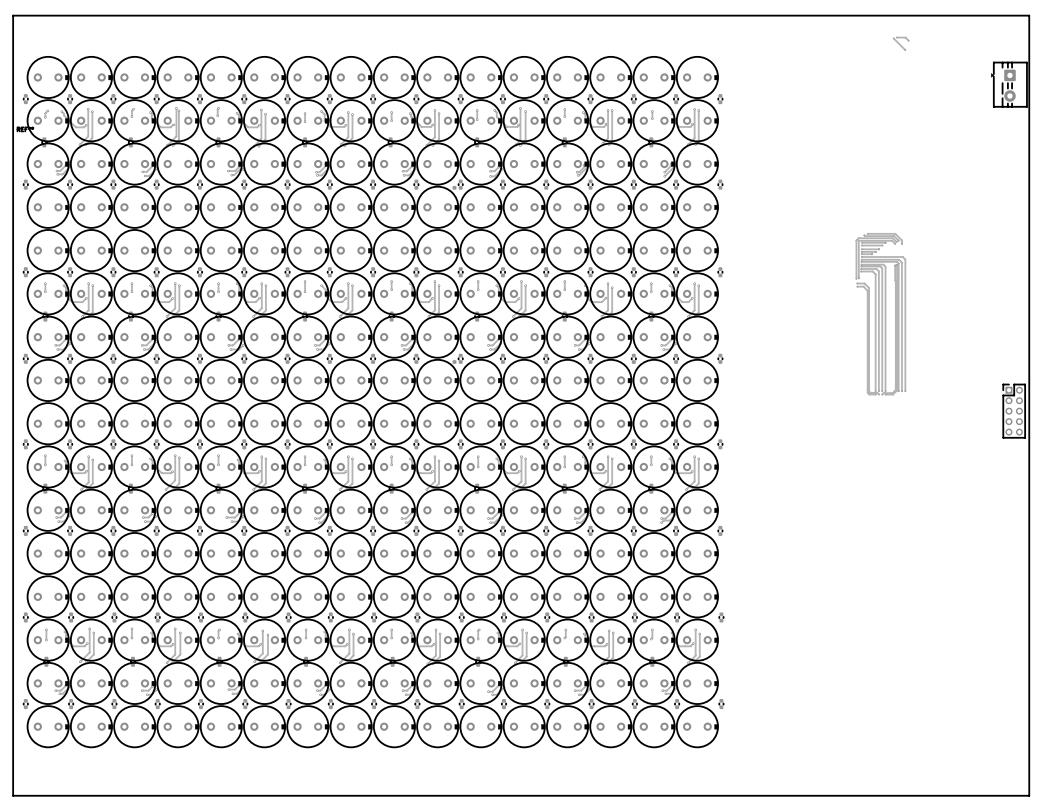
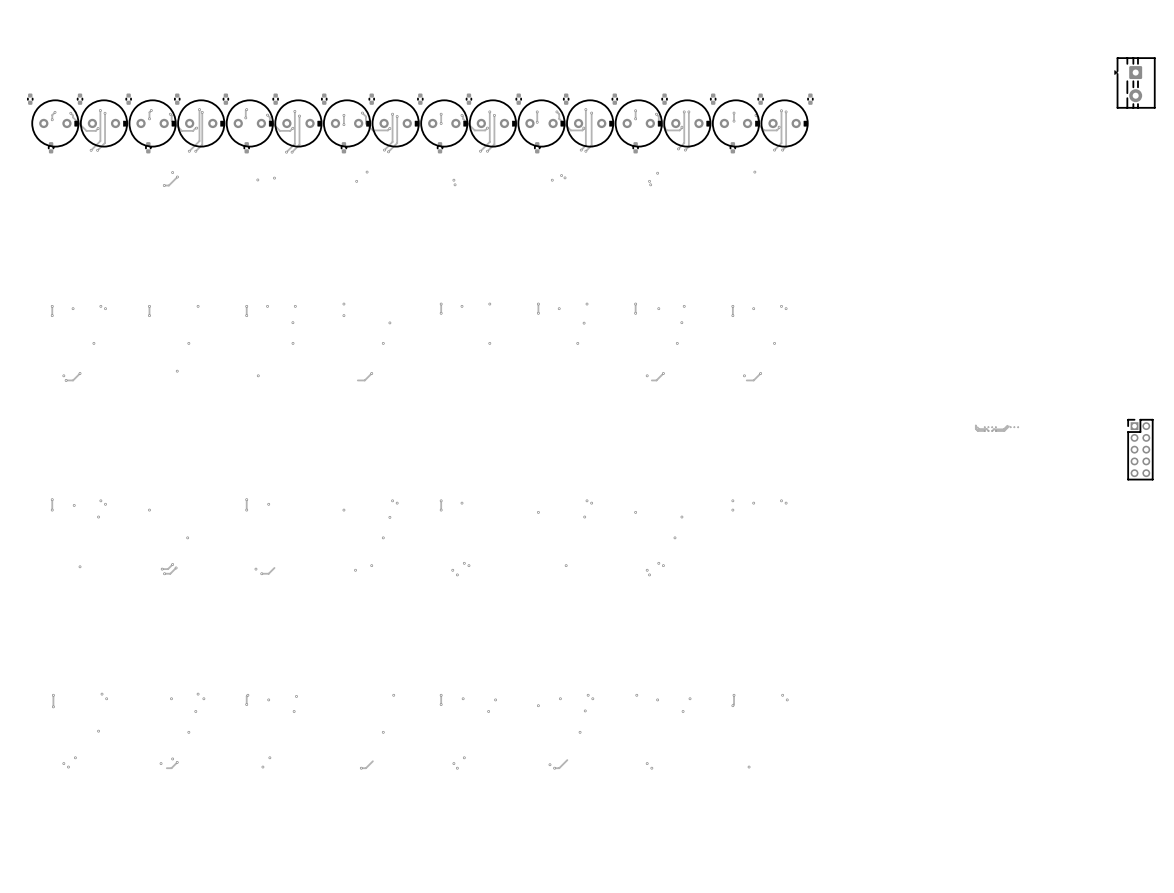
board edge: (13, 15) (1029, 15) (1029, 795) (13, 795) (13, 15) -> none
track: (897, 37) (905, 37) (908, 40) -> none
track: (893, 38) (905, 50) -> none
part: (48, 77) -> none
part: (91, 77) -> none
part: (134, 77) -> none
part: (178, 77) -> none
part: (221, 77) -> none
part: (264, 77) -> none
part: (307, 77) -> none
part: (351, 77) -> none
part: (394, 77) -> none
part: (437, 77) -> none
part: (481, 77) -> none
part: (524, 77) -> none
part: (567, 77) -> none
part: (610, 77) -> none
part: (654, 77) -> none
part: (697, 77) -> none
part: (48, 164) -> none
part: (91, 164) -> none
part: (134, 164) -> none
track: (152, 164) (146, 171) (142, 171) -> none
part: (178, 164) -> none
part: (221, 164) -> none
part: (264, 164) -> none
part: (307, 164) -> none
track: (325, 164) (319, 172) (316, 172) -> none
part: (351, 164) -> none
part: (394, 164) -> none
part: (437, 164) -> none
part: (481, 164) -> none
part: (524, 164) -> none
part: (567, 164) -> none
part: (610, 164) -> none
part: (654, 164) -> none
track: (670, 164) (664, 172) -> none
part: (697, 164) -> none
track: (65, 165) (60, 171) (56, 171) -> none
track: (584, 165) (577, 172) -> none
track: (675, 165) (664, 176) -> none
track: (70, 166) (62, 174) (57, 174) -> none
track: (239, 166) (235, 171) (228, 171) -> none
track: (330, 166) (321, 175) (317, 175) -> none
track: (412, 166) (407, 171) (402, 171) -> none
track: (588, 166) (578, 175) -> none
track: (498, 167) (494, 171) (490, 171) -> none
track: (416, 168) (409, 175) (404, 175) -> none
track: (243, 169) (231, 175) -> none
track: (501, 169) (494, 176) (490, 176) -> none
via: (57, 174) -> none
via: (317, 175) -> none
via: (490, 176) -> none
via: (664, 176) -> none
part: (25, 184) -> none
part: (70, 184) -> none
part: (113, 184) -> none
part: (156, 184) -> none
part: (199, 184) -> none
part: (244, 184) -> none
part: (287, 184) -> none
part: (329, 184) -> none
part: (373, 184) -> none
part: (416, 184) -> none
part: (460, 184) -> none
part: (502, 184) -> none
part: (546, 184) -> none
part: (590, 184) -> none
part: (633, 184) -> none
part: (676, 184) -> none
part: (720, 184) -> none
part: (454, 187) -> none
part: (48, 207) -> none
part: (91, 207) -> none
part: (134, 207) -> none
part: (178, 207) -> none
part: (221, 207) -> none
part: (264, 207) -> none
part: (307, 207) -> none
part: (351, 207) -> none
part: (394, 207) -> none
part: (437, 207) -> none
part: (481, 207) -> none
part: (524, 207) -> none
part: (567, 207) -> none
part: (610, 207) -> none
part: (654, 207) -> none
part: (697, 207) -> none
track: (867, 233) (895, 233) (901, 240) (901, 243) -> none
track: (864, 235) (894, 236) (898, 240) -> none
track: (896, 241) (892, 238) (858, 238) (856, 240) (856, 278) -> none
track: (862, 242) (885, 242) -> none
track: (895, 243) (892, 240) (859, 240) (858, 278) -> none
track: (861, 245) (882, 245) -> none
track: (861, 249) (879, 249) -> none
part: (48, 250) -> none
part: (91, 250) -> none
part: (134, 250) -> none
part: (178, 250) -> none
part: (221, 250) -> none
part: (264, 250) -> none
part: (307, 250) -> none
part: (351, 250) -> none
part: (394, 250) -> none
part: (437, 250) -> none
part: (481, 250) -> none
part: (524, 250) -> none
part: (567, 250) -> none
part: (610, 250) -> none
part: (654, 250) -> none
part: (697, 250) -> none
track: (861, 251) (875, 251) -> none
track: (861, 254) (872, 254) -> none
track: (861, 256) (902, 256) (905, 259) (905, 391) -> none
track: (861, 259) (899, 259) (901, 262) (901, 391) -> none
track: (861, 261) (896, 261) (898, 263) (898, 391) -> none
track: (861, 264) (883, 264) (885, 266) (885, 391) -> none
track: (895, 265) (895, 389) -> none
track: (897, 265) (897, 390) -> none
track: (861, 266) (880, 266) (882, 268) (882, 391) -> none
track: (861, 269) (876, 269) (878, 271) (878, 391) -> none
track: (861, 271) (872, 271) (875, 274) (875, 391) -> none
part: (25, 272) -> none
part: (70, 272) -> none
part: (113, 272) -> none
part: (156, 272) -> none
part: (199, 272) -> none
part: (244, 272) -> none
part: (287, 272) -> none
part: (329, 272) -> none
part: (373, 272) -> none
part: (416, 272) -> none
part: (460, 272) -> none
part: (502, 272) -> none
part: (546, 272) -> none
part: (590, 272) -> none
part: (633, 272) -> none
part: (676, 272) -> none
part: (720, 272) -> none
track: (305, 281) (305, 291) -> none
track: (434, 281) (434, 310) (428, 316) -> none
track: (521, 281) (521, 308) (513, 316) -> none
track: (88, 283) (88, 310) (82, 316) -> none
track: (175, 283) (175, 308) (166, 316) -> none
track: (237, 283) (239, 285) (239, 293) (247, 302) (255, 302) (259, 298) -> none
track: (261, 283) (261, 308) (253, 316) -> none
track: (348, 283) (348, 308) (340, 316) -> none
via: (348, 283) -> none
track: (410, 283) (412, 285) (412, 293) (420, 302) (428, 302) (432, 298) -> none
track: (608, 283) (608, 310) (601, 316) -> none
track: (694, 283) (694, 310) (688, 316) -> none
track: (857, 283) (864, 283) (869, 288) (869, 391) -> none
track: (63, 285) (65, 287) (65, 295) (72, 302) (82, 302) (86, 298) -> none
track: (92, 285) (92, 312) (88, 316) -> none
track: (150, 285) (152, 287) (152, 295) (158, 302) (169, 302) (172, 298) -> none
via: (150, 285) -> none
track: (179, 285) (179, 310) (173, 316) -> none
via: (179, 285) -> none
track: (265, 285) (265, 310) (259, 316) -> none
track: (321, 285) (325, 289) (325, 295) (331, 302) (342, 302) (345, 298) -> none
via: (321, 285) -> none
track: (352, 285) (352, 310) (346, 316) -> none
via: (352, 285) -> none
track: (439, 285) (439, 312) (434, 316) -> none
track: (496, 285) (498, 287) (498, 295) (505, 302) (515, 302) (518, 298) -> none
track: (525, 285) (525, 310) (519, 316) -> none
via: (525, 285) -> none
track: (585, 285) (587, 287) (587, 298) (591, 302) (601, 302) (605, 298) -> none
track: (669, 285) (671, 291) (682, 302) (688, 302) (692, 298) -> none
track: (698, 285) (698, 312) (694, 316) -> none
track: (857, 286) (863, 286) (867, 290) (867, 389) -> none
track: (612, 287) (612, 312) (608, 316) -> none
part: (48, 293) -> none
part: (91, 293) -> none
part: (134, 293) -> none
part: (178, 293) -> none
part: (221, 293) -> none
part: (264, 293) -> none
part: (307, 293) -> none
part: (351, 293) -> none
part: (394, 293) -> none
part: (437, 293) -> none
part: (481, 293) -> none
part: (524, 293) -> none
part: (567, 293) -> none
part: (610, 293) -> none
part: (654, 293) -> none
part: (697, 293) -> none
via: (86, 298) -> none
via: (172, 298) -> none
via: (432, 298) -> none
via: (692, 298) -> none
part: (45, 316) -> none
part: (130, 316) -> none
part: (218, 316) -> none
via: (253, 316) -> none
part: (305, 316) -> none
part: (391, 316) -> none
via: (428, 316) -> none
part: (477, 316) -> none
part: (564, 316) -> none
part: (651, 316) -> none
part: (48, 337) -> none
part: (91, 337) -> none
part: (134, 337) -> none
part: (178, 337) -> none
part: (221, 337) -> none
part: (264, 337) -> none
part: (307, 337) -> none
part: (351, 337) -> none
part: (394, 337) -> none
part: (437, 337) -> none
part: (481, 337) -> none
part: (524, 337) -> none
part: (567, 337) -> none
part: (610, 337) -> none
part: (654, 337) -> none
part: (697, 337) -> none
track: (65, 339) (59, 345) (55, 345) -> none
track: (152, 339) (146, 345) (142, 345) -> none
track: (239, 339) (232, 345) (228, 345) -> none
track: (325, 339) (319, 345) (315, 345) -> none
track: (412, 339) (406, 345) (401, 345) -> none
track: (498, 339) (492, 345) (488, 345) -> none
track: (585, 339) (579, 345) (575, 345) -> none
track: (671, 339) (665, 345) (661, 345) -> none
track: (156, 341) (148, 349) (144, 349) -> none
track: (416, 341) (408, 349) (404, 349) -> none
track: (500, 343) (494, 349) (490, 349) -> none
via: (142, 345) -> none
track: (243, 345) (239, 349) (230, 349) -> none
via: (243, 345) -> none
via: (315, 345) -> none
via: (401, 345) -> none
via: (488, 345) -> none
via: (144, 349) -> none
via: (230, 349) -> none
via: (317, 349) -> none
via: (404, 349) -> none
via: (490, 349) -> none
via: (579, 349) -> none
via: (663, 349) -> none
part: (25, 358) -> none
part: (70, 358) -> none
part: (113, 358) -> none
part: (156, 358) -> none
part: (199, 358) -> none
part: (244, 358) -> none
part: (287, 358) -> none
part: (329, 358) -> none
part: (373, 358) -> none
part: (416, 358) -> none
part: (460, 358) -> none
part: (502, 358) -> none
part: (546, 358) -> none
part: (590, 358) -> none
part: (633, 358) -> none
part: (676, 358) -> none
part: (720, 358) -> none
part: (454, 362) -> none
part: (48, 380) -> none
part: (91, 380) -> none
part: (134, 380) -> none
part: (178, 380) -> none
part: (221, 380) -> none
part: (264, 380) -> none
part: (307, 380) -> none
part: (351, 380) -> none
part: (394, 380) -> none
part: (437, 380) -> none
part: (481, 380) -> none
part: (524, 380) -> none
part: (567, 380) -> none
part: (610, 380) -> none
part: (654, 380) -> none
part: (697, 380) -> none
part: (48, 423) -> none
part: (91, 423) -> none
part: (134, 423) -> none
part: (178, 423) -> none
part: (221, 423) -> none
part: (264, 423) -> none
part: (307, 423) -> none
part: (351, 423) -> none
part: (394, 423) -> none
part: (437, 423) -> none
part: (481, 423) -> none
part: (524, 423) -> none
part: (567, 423) -> none
part: (610, 423) -> none
part: (654, 423) -> none
part: (697, 423) -> none
part: (25, 444) -> none
part: (70, 444) -> none
part: (113, 444) -> none
part: (156, 444) -> none
part: (199, 444) -> none
part: (244, 444) -> none
part: (287, 444) -> none
part: (329, 444) -> none
part: (373, 444) -> none
part: (416, 444) -> none
part: (460, 444) -> none
part: (502, 444) -> none
part: (546, 444) -> none
part: (590, 444) -> none
part: (633, 444) -> none
part: (676, 444) -> none
part: (720, 444) -> none
track: (131, 455) (131, 464) -> none
track: (175, 455) (175, 480) (165, 489) -> none
track: (88, 456) (88, 482) (81, 489) -> none
track: (261, 456) (261, 481) (253, 489) -> none
track: (305, 456) (305, 464) -> none
track: (348, 456) (348, 481) (340, 489) -> none
track: (434, 456) (434, 481) (426, 489) -> none
track: (478, 456) (478, 467) -> none
track: (521, 456) (521, 481) (513, 489) -> none
track: (564, 456) (564, 467) -> none
track: (583, 456) (585, 458) (585, 467) (591, 473) (603, 473) (606, 471) -> none
via: (583, 456) -> none
track: (608, 456) (608, 481) (599, 489) -> none
track: (651, 456) (651, 464) -> none
track: (694, 456) (694, 481) (686, 489) -> none
track: (179, 457) (179, 483) (173, 489) -> none
via: (179, 457) -> none
track: (150, 458) (152, 463) (161, 473) (172, 471) -> none
via: (150, 458) -> none
track: (265, 458) (265, 483) (259, 489) -> none
track: (352, 458) (352, 483) (346, 489) -> none
track: (410, 458) (412, 467) (418, 473) (430, 473) (432, 471) -> none
track: (496, 458) (498, 464) (507, 473) (517, 473) (519, 471) -> none
track: (525, 458) (525, 483) (519, 489) -> none
track: (612, 458) (612, 483) (606, 489) -> none
track: (669, 458) (671, 460) (671, 469) (676, 473) (690, 473) (692, 471) -> none
track: (698, 458) (698, 483) (692, 489) -> none
track: (92, 459) (92, 483) (86, 489) -> none
track: (238, 459) (239, 468) (244, 473) (257, 473) (259, 471) -> none
track: (324, 459) (325, 465) (332, 473) (344, 473) (345, 471) -> none
track: (64, 460) (65, 468) (71, 473) (84, 473) (86, 471) -> none
track: (439, 460) (439, 483) (432, 489) -> none
part: (48, 467) -> none
part: (91, 467) -> none
part: (134, 467) -> none
part: (178, 467) -> none
part: (221, 467) -> none
part: (264, 467) -> none
part: (307, 467) -> none
part: (351, 467) -> none
part: (394, 467) -> none
part: (437, 467) -> none
part: (481, 467) -> none
part: (524, 467) -> none
part: (567, 467) -> none
part: (610, 467) -> none
part: (654, 467) -> none
part: (697, 467) -> none
via: (172, 471) -> none
via: (259, 471) -> none
via: (432, 471) -> none
via: (692, 471) -> none
part: (45, 488) -> none
part: (130, 488) -> none
part: (218, 488) -> none
part: (305, 488) -> none
part: (391, 488) -> none
part: (477, 488) -> none
part: (564, 488) -> none
part: (651, 488) -> none
via: (81, 489) -> none
via: (253, 489) -> none
via: (426, 489) -> none
via: (513, 489) -> none
via: (686, 489) -> none
part: (48, 510) -> none
part: (91, 510) -> none
part: (134, 510) -> none
part: (178, 510) -> none
part: (221, 510) -> none
part: (264, 510) -> none
part: (307, 510) -> none
part: (351, 510) -> none
part: (394, 510) -> none
part: (437, 510) -> none
part: (481, 510) -> none
part: (524, 510) -> none
part: (567, 510) -> none
part: (610, 510) -> none
part: (654, 510) -> none
part: (697, 510) -> none
track: (65, 512) (60, 517) (56, 517) -> none
track: (240, 512) (235, 517) (226, 517) -> none
track: (325, 512) (319, 518) (315, 518) -> none
track: (412, 512) (406, 518) (401, 518) -> none
track: (498, 512) (492, 518) (488, 518) -> none
track: (585, 512) (579, 518) (575, 518) -> none
track: (671, 512) (665, 518) (661, 518) -> none
track: (676, 513) (669, 520) (661, 522) -> none
track: (329, 514) (319, 522) -> none
track: (416, 514) (406, 522) -> none
track: (502, 514) (494, 522) (490, 522) -> none
track: (589, 514) (581, 522) (577, 522) -> none
track: (70, 515) (63, 521) (58, 521) -> none
via: (243, 516) -> none
via: (56, 517) -> none
via: (488, 518) -> none
via: (661, 518) -> none
via: (58, 521) -> none
via: (319, 522) -> none
via: (490, 522) -> none
via: (661, 522) -> none
part: (25, 530) -> none
part: (70, 530) -> none
part: (113, 530) -> none
part: (156, 530) -> none
part: (199, 530) -> none
part: (244, 530) -> none
part: (287, 530) -> none
part: (329, 530) -> none
part: (373, 530) -> none
part: (416, 530) -> none
part: (460, 530) -> none
part: (502, 530) -> none
part: (546, 530) -> none
part: (590, 530) -> none
part: (633, 530) -> none
part: (676, 530) -> none
part: (720, 530) -> none
part: (48, 553) -> none
part: (91, 553) -> none
part: (134, 553) -> none
part: (178, 553) -> none
part: (221, 553) -> none
part: (264, 553) -> none
part: (307, 553) -> none
part: (351, 553) -> none
part: (394, 553) -> none
part: (437, 553) -> none
part: (481, 553) -> none
part: (524, 553) -> none
part: (567, 553) -> none
part: (610, 553) -> none
part: (654, 553) -> none
part: (697, 553) -> none
part: (48, 596) -> none
part: (91, 596) -> none
part: (134, 596) -> none
part: (178, 596) -> none
part: (221, 596) -> none
part: (264, 596) -> none
part: (307, 596) -> none
part: (351, 596) -> none
part: (394, 596) -> none
part: (437, 596) -> none
part: (481, 596) -> none
part: (524, 596) -> none
part: (567, 596) -> none
part: (610, 596) -> none
part: (654, 596) -> none
part: (697, 596) -> none
part: (25, 617) -> none
part: (71, 617) -> none
part: (114, 617) -> none
part: (157, 617) -> none
part: (200, 617) -> none
part: (245, 617) -> none
part: (288, 617) -> none
part: (330, 617) -> none
part: (374, 617) -> none
part: (417, 617) -> none
part: (461, 617) -> none
part: (503, 617) -> none
part: (547, 617) -> none
part: (591, 617) -> none
part: (634, 617) -> none
part: (677, 617) -> none
part: (721, 617) -> none
track: (89, 628) (89, 652) (80, 661) -> none
track: (131, 628) (131, 638) -> none
track: (175, 628) (175, 654) (166, 662) -> none
track: (306, 629) (306, 638) -> none
track: (349, 629) (349, 653) (340, 662) -> none
track: (435, 629) (435, 655) (427, 663) -> none
track: (479, 629) (478, 639) -> none
track: (522, 629) (522, 655) (515, 662) -> none
track: (565, 629) (564, 638) -> none
track: (695, 629) (695, 655) (688, 662) -> none
track: (262, 630) (262, 653) (254, 661) -> none
track: (609, 630) (609, 656) (601, 663) -> none
track: (64, 631) (65, 639) (73, 646) (84, 646) (87, 643) -> none
track: (324, 631) (325, 639) (332, 646) (345, 646) (347, 644) -> none
track: (93, 632) (93, 654) (86, 661) -> none
track: (151, 632) (152, 639) (159, 646) (171, 646) (173, 644) -> none
track: (180, 632) (180, 654) (172, 662) -> none
track: (411, 632) (412, 640) (418, 646) (431, 646) (433, 644) -> none
track: (497, 632) (498, 639) (506, 646) (517, 646) (519, 643) -> none
track: (526, 632) (526, 656) (520, 662) -> none
track: (613, 632) (613, 657) (607, 663) -> none
track: (671, 632) (672, 640) (679, 646) (690, 646) (693, 643) -> none
track: (238, 633) (239, 640) (245, 646) (258, 646) (260, 644) -> none
track: (353, 633) (353, 655) (346, 662) -> none
via: (353, 633) -> none
track: (440, 633) (440, 656) (432, 663) -> none
track: (584, 633) (585, 640) (591, 646) (604, 646) (607, 644) -> none
track: (699, 633) (699, 656) (693, 662) -> none
track: (267, 635) (267, 654) (259, 662) -> none
part: (48, 640) -> none
part: (91, 640) -> none
part: (134, 640) -> none
part: (178, 640) -> none
part: (221, 640) -> none
part: (264, 640) -> none
part: (307, 640) -> none
part: (351, 640) -> none
part: (394, 640) -> none
part: (437, 640) -> none
part: (481, 640) -> none
part: (524, 640) -> none
part: (567, 640) -> none
part: (610, 640) -> none
part: (654, 640) -> none
part: (697, 640) -> none
via: (87, 643) -> none
via: (693, 643) -> none
via: (347, 644) -> none
part: (46, 661) -> none
via: (80, 661) -> none
part: (132, 661) -> none
part: (219, 661) -> none
via: (254, 661) -> none
part: (306, 661) -> none
part: (392, 661) -> none
part: (478, 661) -> none
part: (565, 661) -> none
part: (652, 661) -> none
via: (688, 662) -> none
part: (48, 683) -> none
part: (91, 683) -> none
part: (134, 683) -> none
part: (178, 683) -> none
part: (221, 683) -> none
part: (264, 683) -> none
part: (307, 683) -> none
part: (351, 683) -> none
part: (394, 683) -> none
part: (437, 683) -> none
part: (481, 683) -> none
part: (524, 683) -> none
part: (567, 683) -> none
part: (610, 683) -> none
part: (654, 683) -> none
part: (697, 683) -> none
track: (499, 684) (492, 691) (488, 691) -> none
track: (672, 684) (666, 690) (662, 690) -> none
track: (65, 685) (60, 690) (55, 690) -> none
track: (239, 685) (235, 689) (228, 689) -> none
track: (325, 685) (320, 690) (317, 690) -> none
track: (412, 685) (407, 690) (402, 690) -> none
track: (586, 685) (581, 690) (575, 690) -> none
track: (70, 686) (62, 693) (59, 693) -> none
track: (152, 686) (148, 690) (142, 690) -> none
track: (243, 687) (237, 693) (232, 693) -> none
track: (417, 687) (410, 694) (406, 694) -> none
track: (677, 687) (670, 693) (665, 693) -> none
track: (590, 688) (584, 694) (579, 694) -> none
via: (228, 689) -> none
via: (317, 690) -> none
via: (662, 690) -> none
via: (147, 694) -> none
part: (25, 704) -> none
part: (71, 704) -> none
part: (114, 704) -> none
part: (157, 704) -> none
part: (200, 704) -> none
part: (245, 704) -> none
part: (288, 704) -> none
part: (330, 704) -> none
part: (374, 704) -> none
part: (417, 704) -> none
part: (461, 704) -> none
part: (503, 704) -> none
part: (547, 704) -> none
part: (591, 704) -> none
part: (634, 704) -> none
part: (677, 704) -> none
part: (721, 704) -> none
part: (48, 726) -> none
part: (91, 726) -> none
part: (134, 726) -> none
part: (178, 726) -> none
part: (221, 726) -> none
part: (264, 726) -> none
part: (307, 726) -> none
part: (351, 726) -> none
part: (394, 726) -> none
part: (437, 726) -> none
part: (481, 726) -> none
part: (524, 726) -> none
part: (567, 726) -> none
part: (610, 726) -> none
part: (654, 726) -> none
part: (697, 726) -> none

